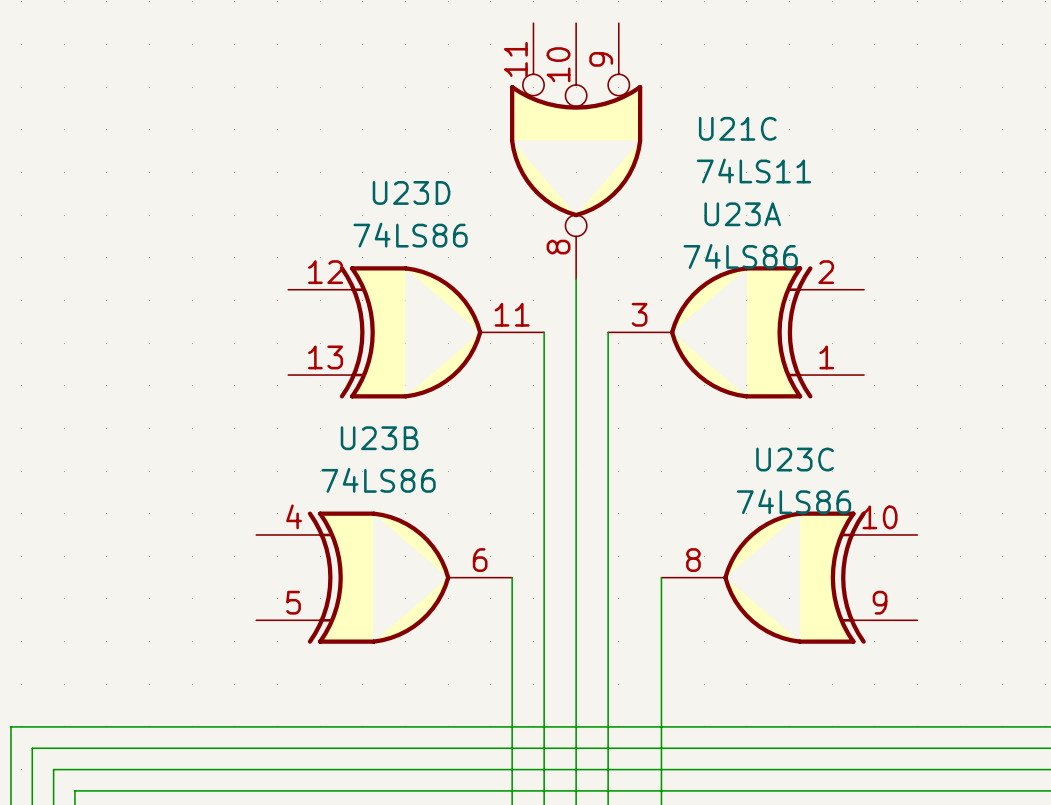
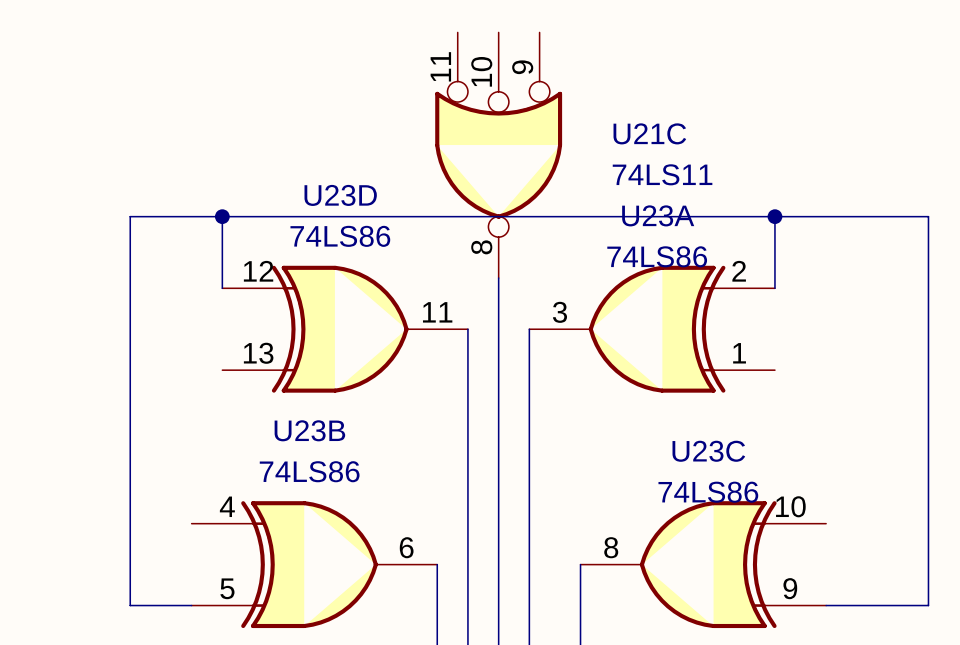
wire: none -> (222, 216) (222, 288)
junction: none -> (222, 216)
wire: none -> (774, 216) (774, 288)
junction: none -> (774, 216)
wire: none -> (191, 605) (130, 605) (130, 216) (928, 216) (928, 605) (826, 605)

